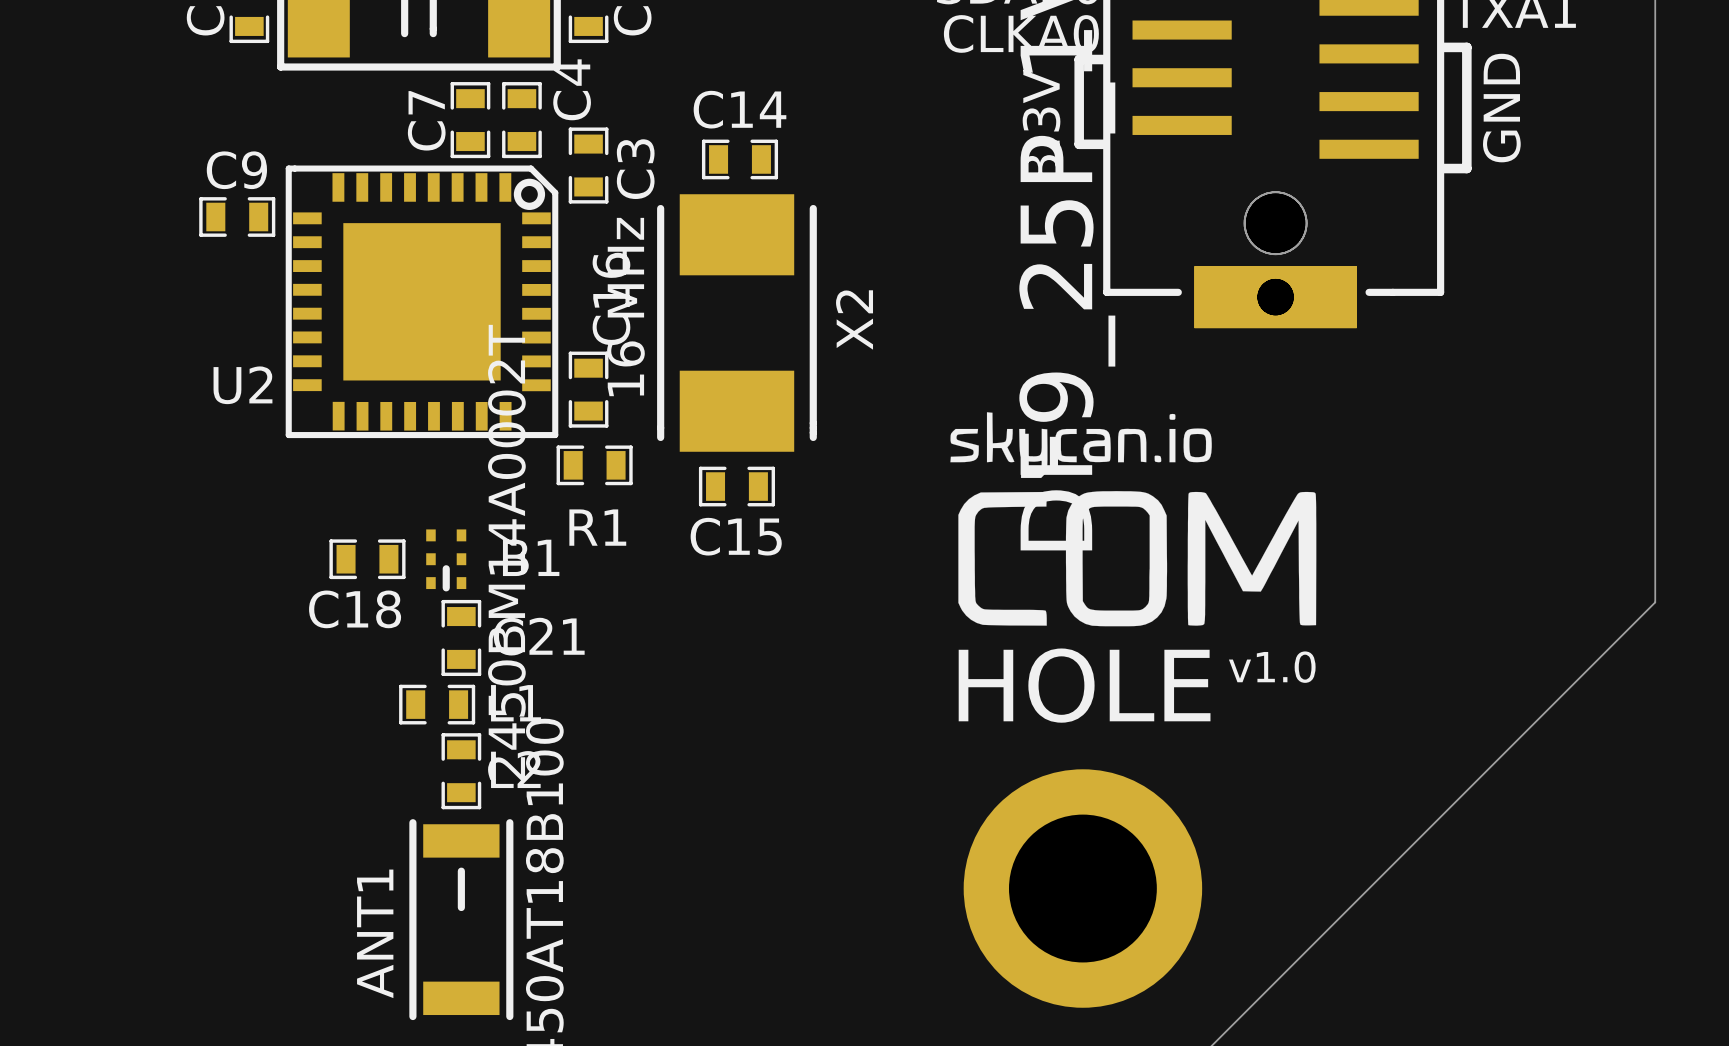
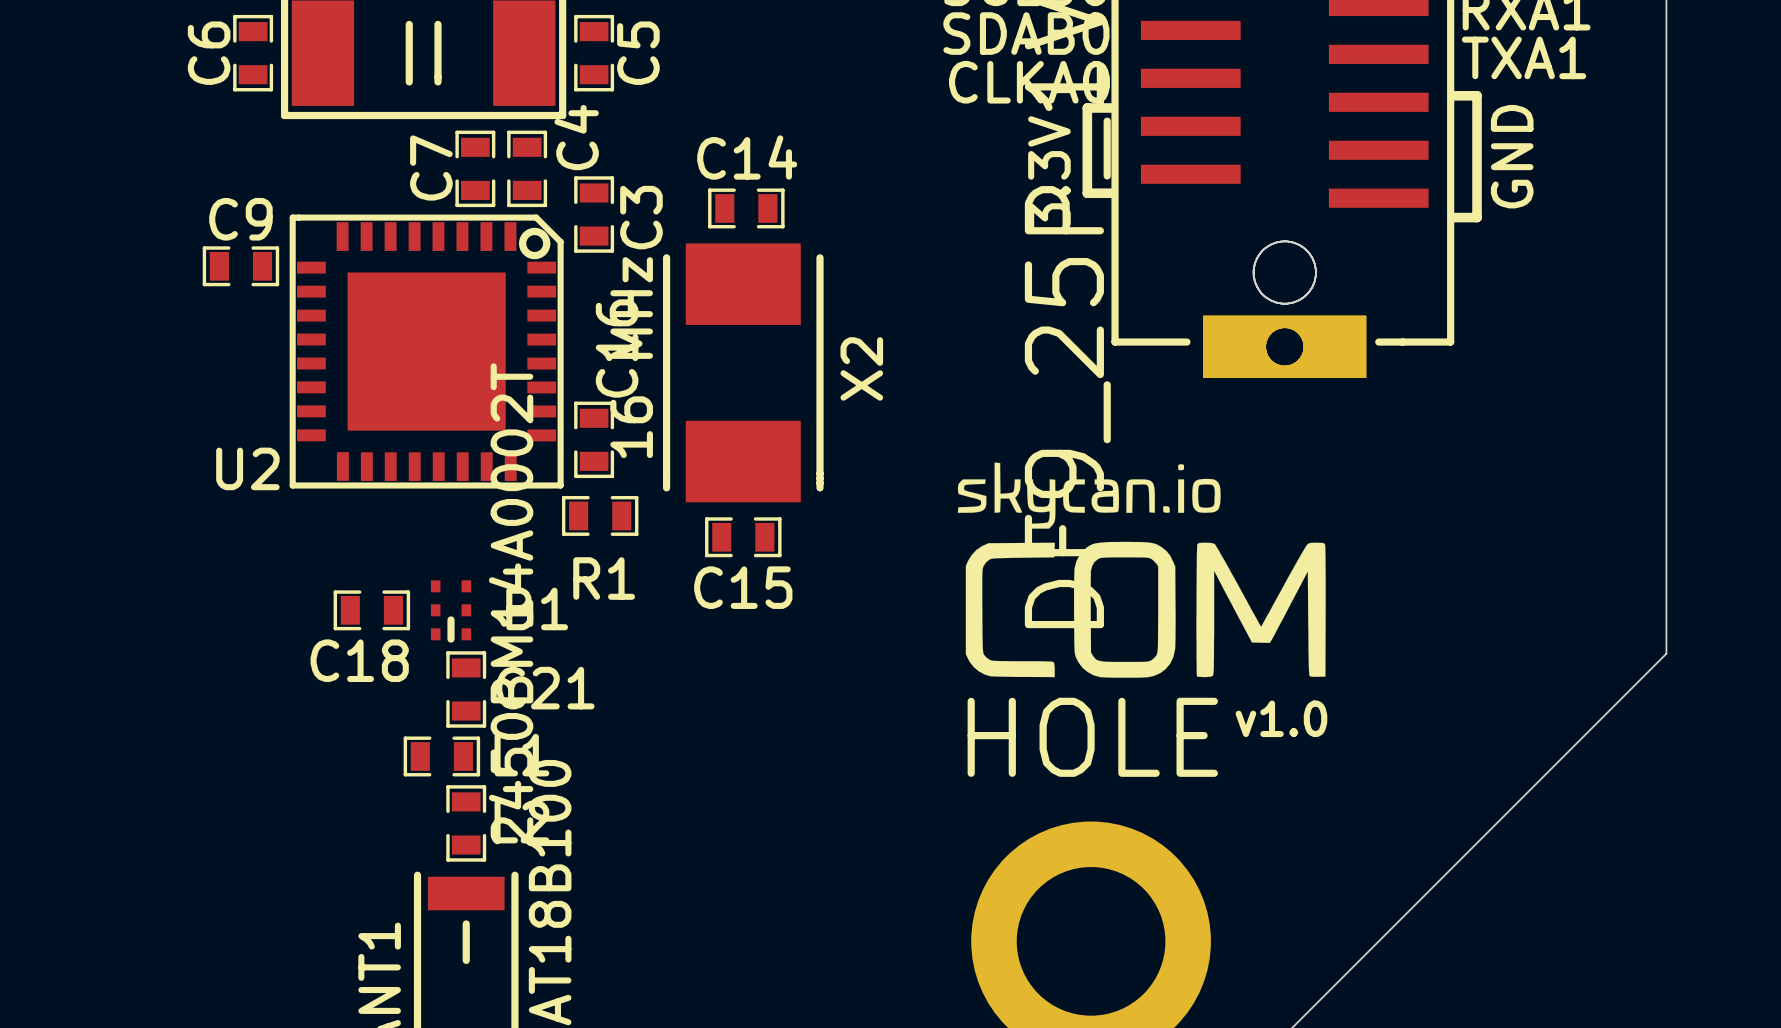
U2 name position: U2 (242, 385) -> U2 (247, 468)

